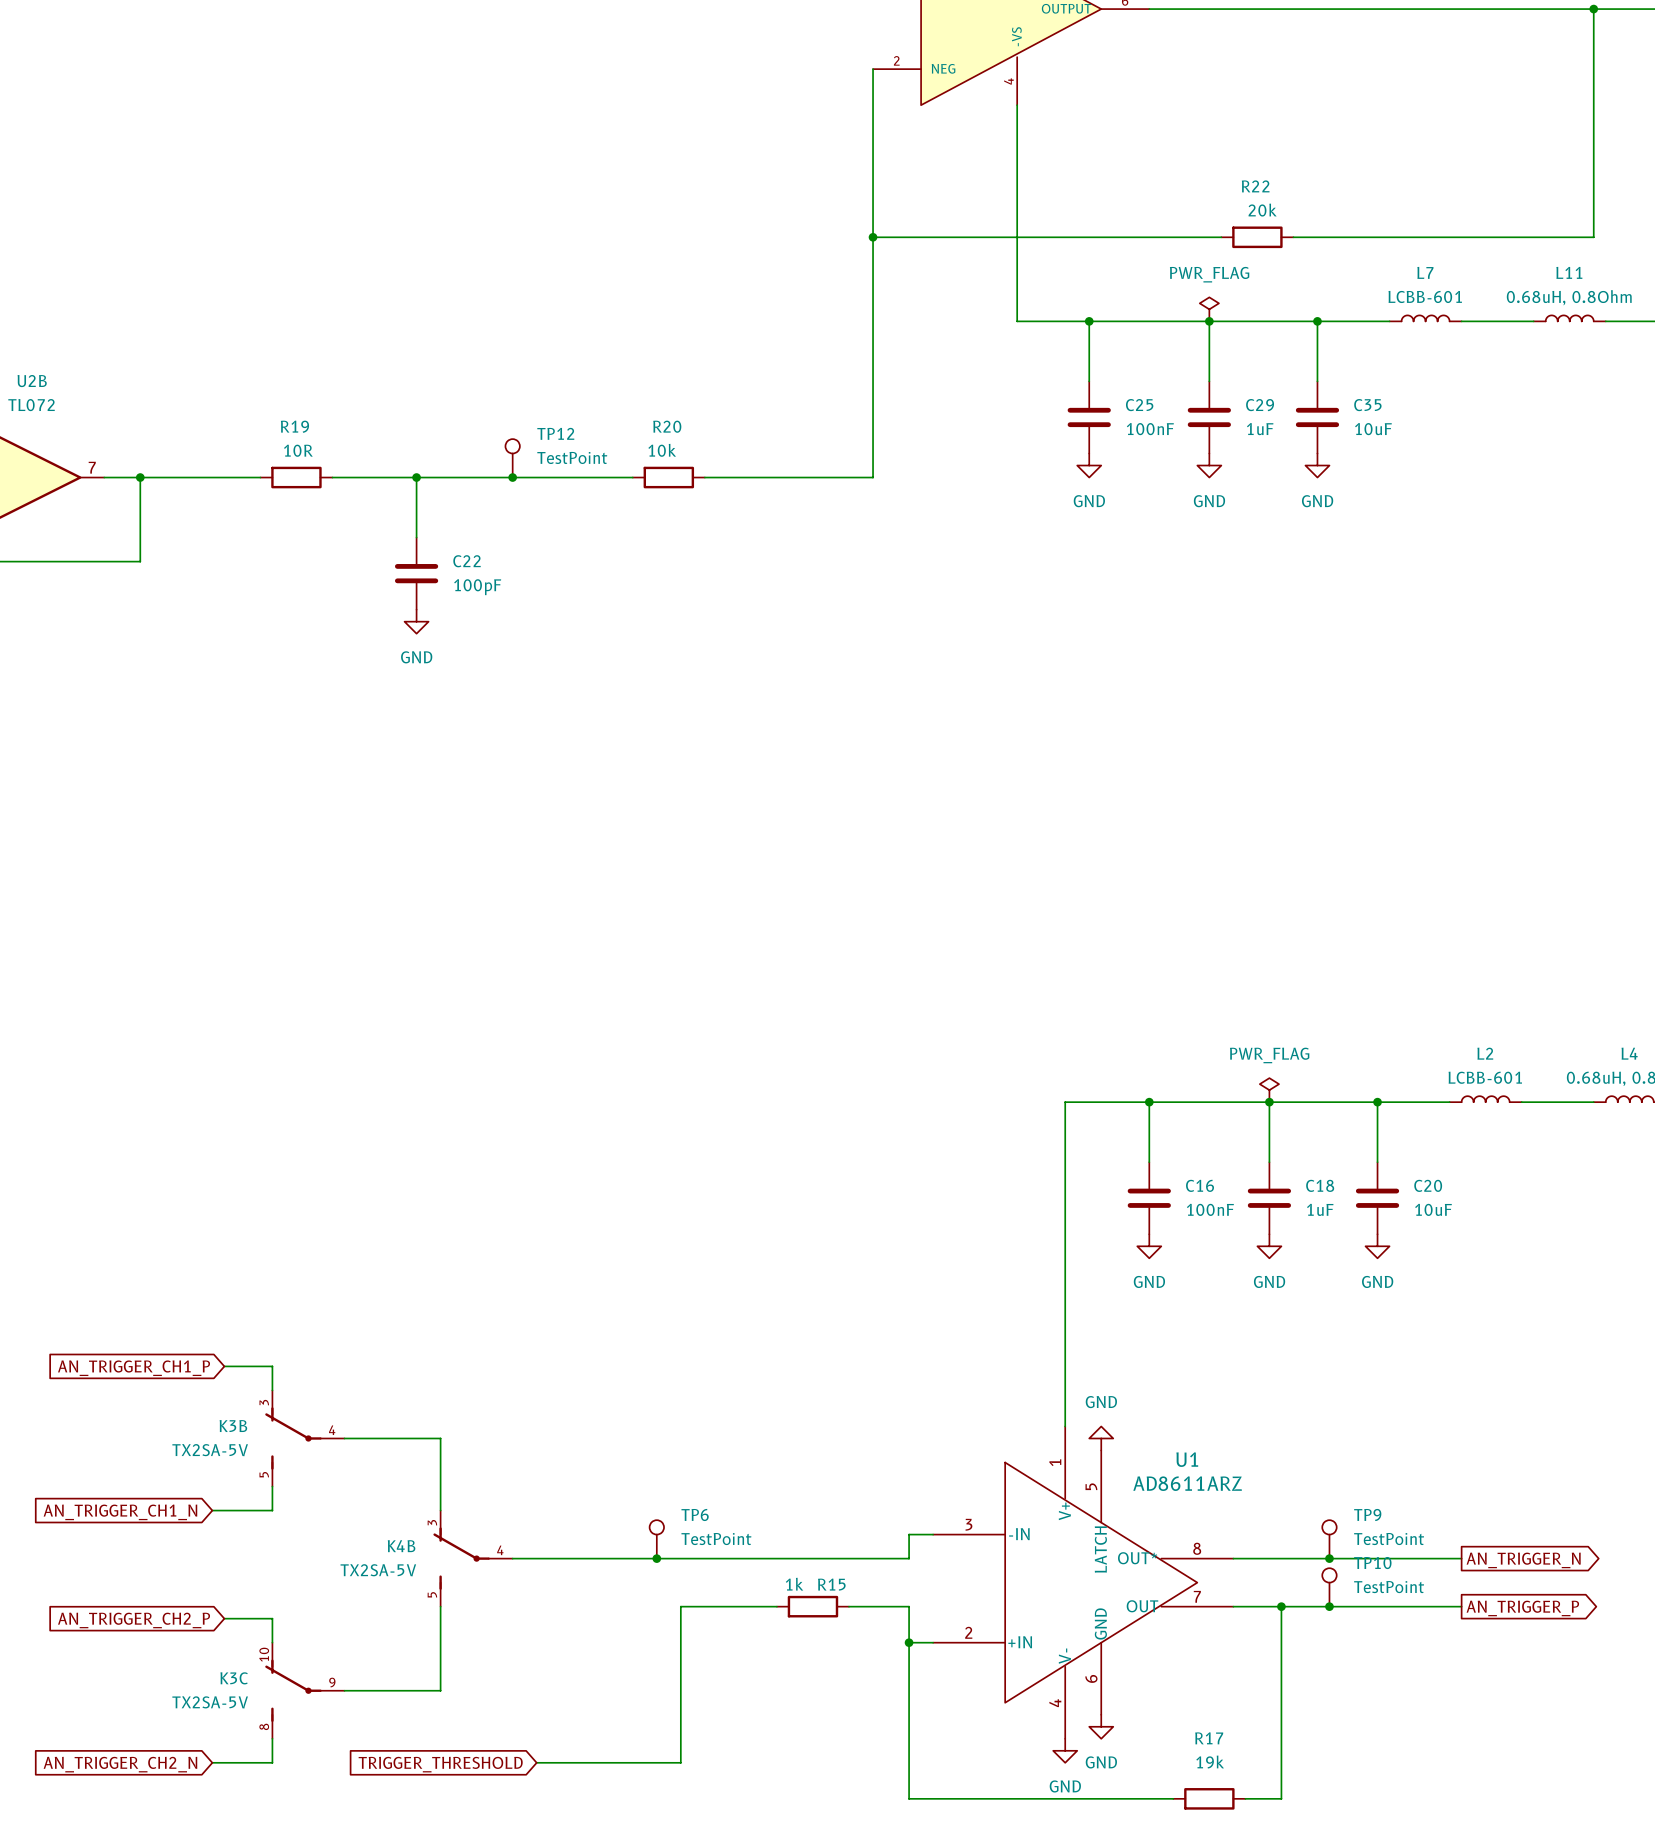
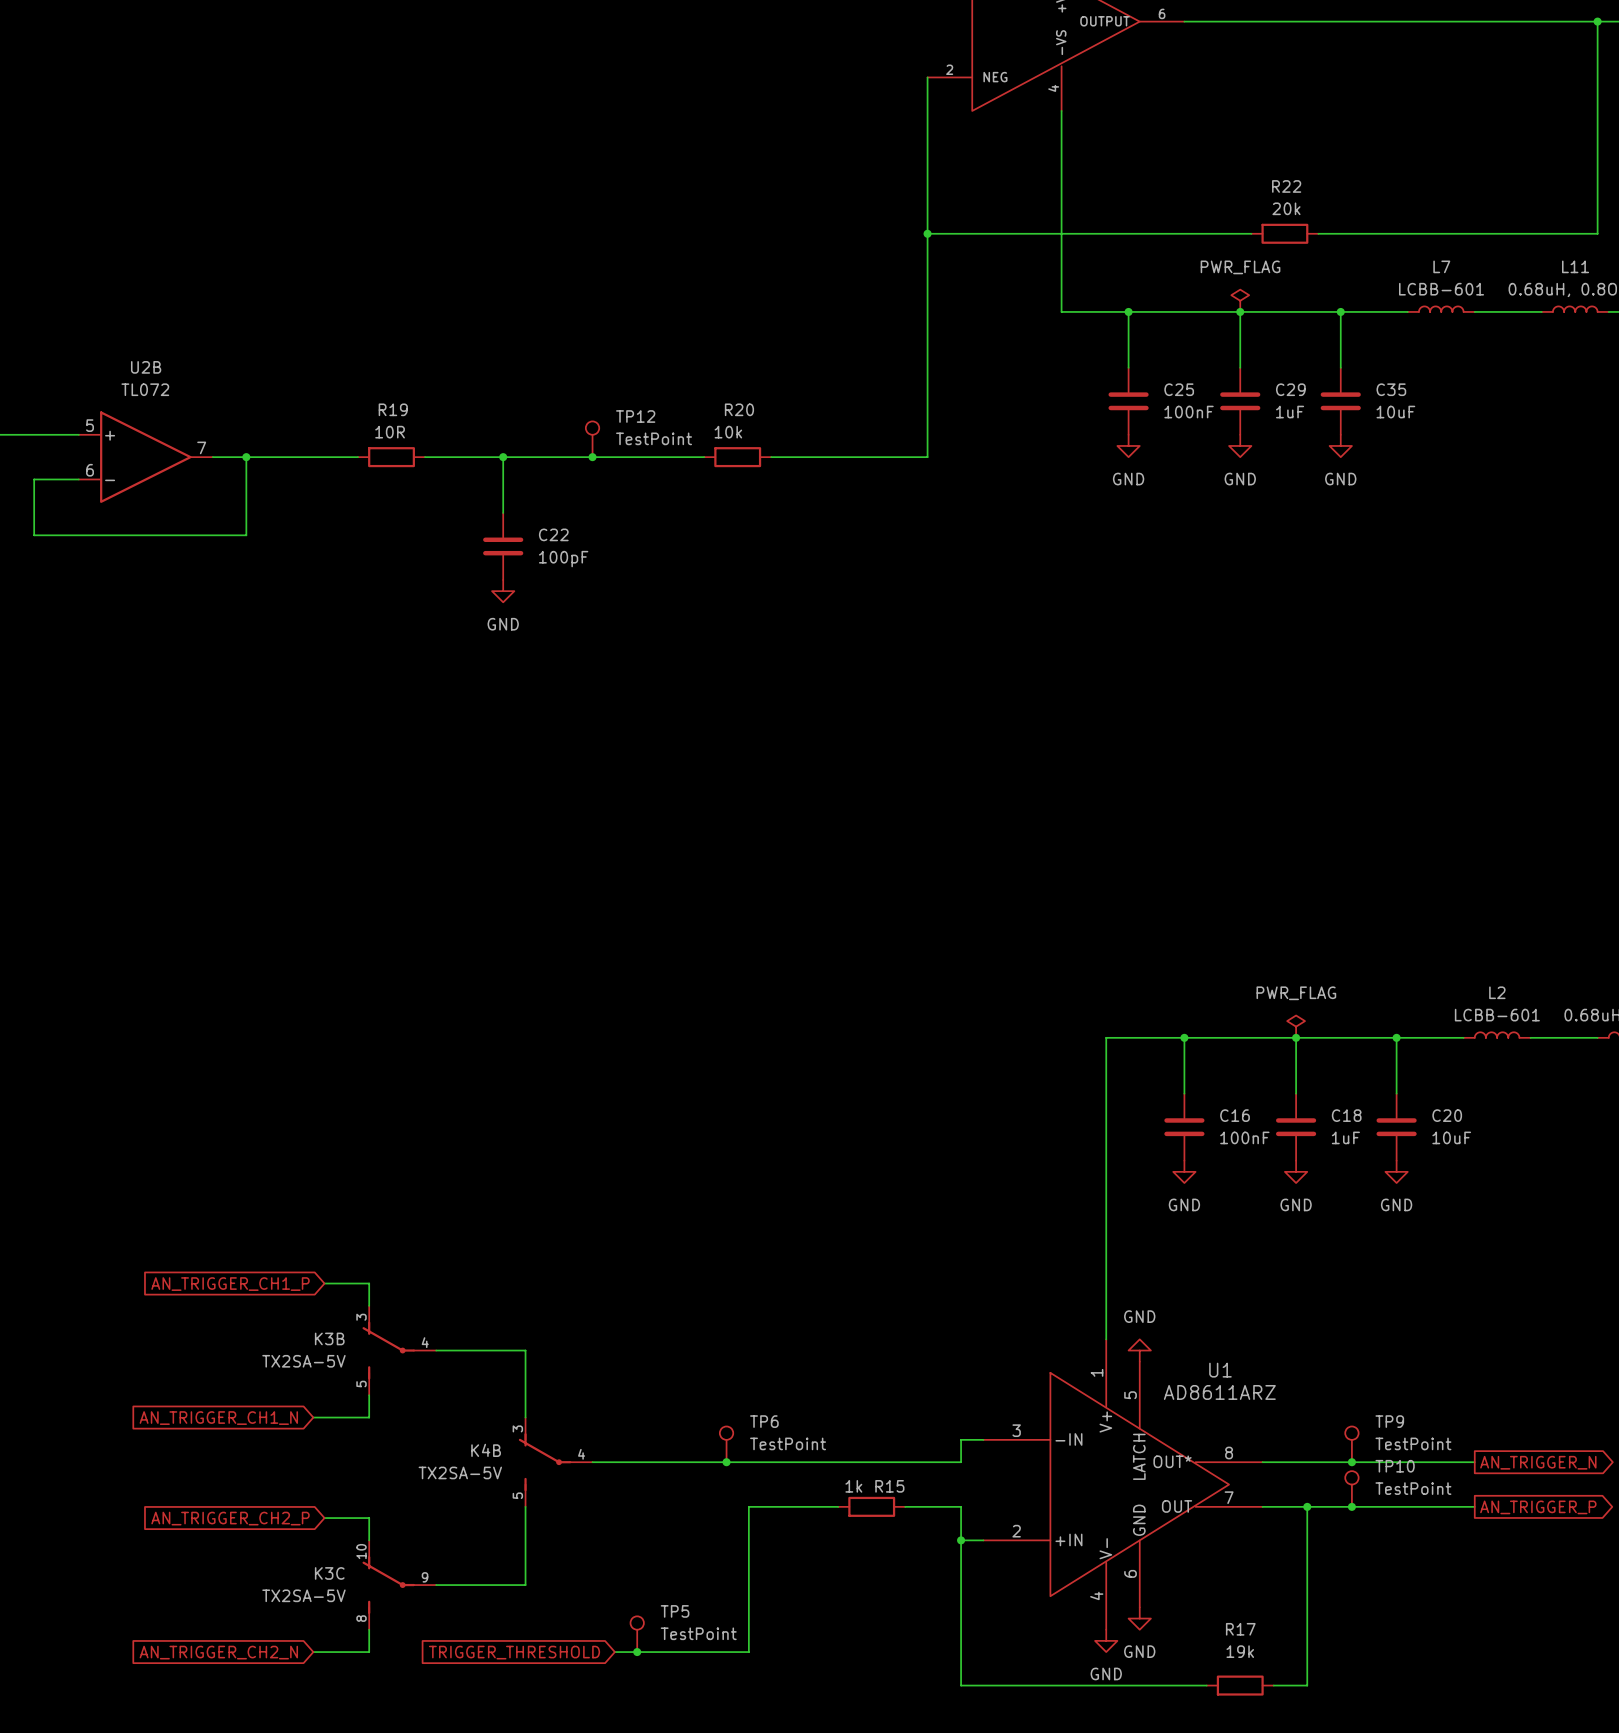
TP5: none -> TestPoint (637, 1634)
junction: none -> (637, 1652)

